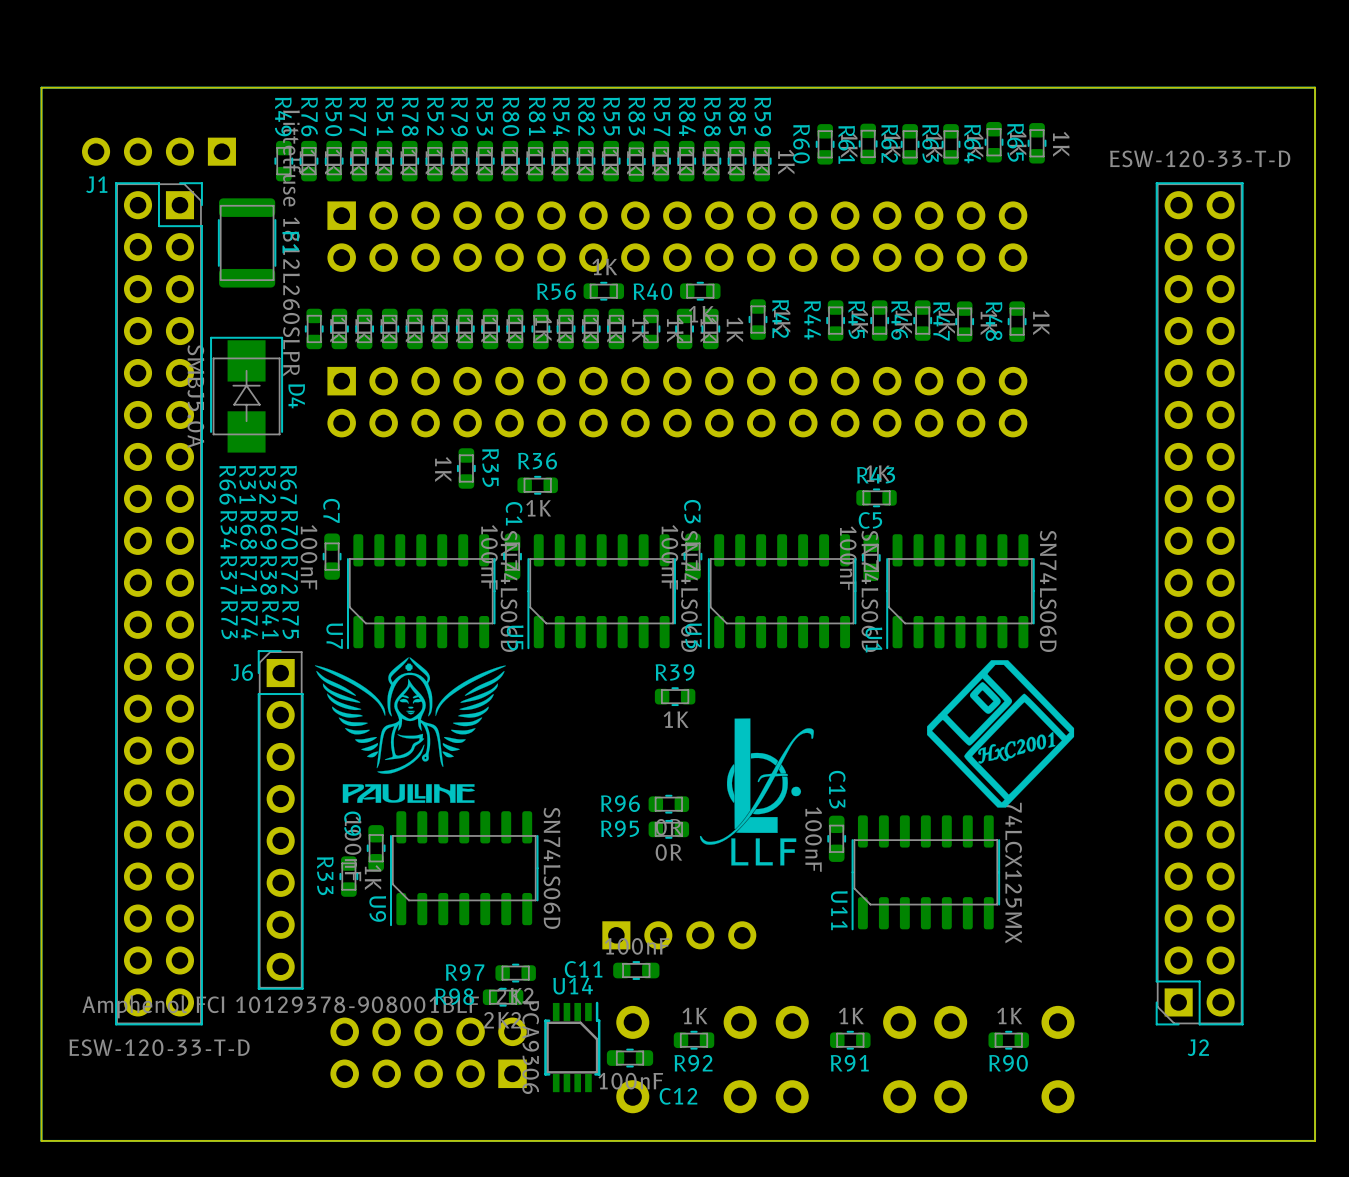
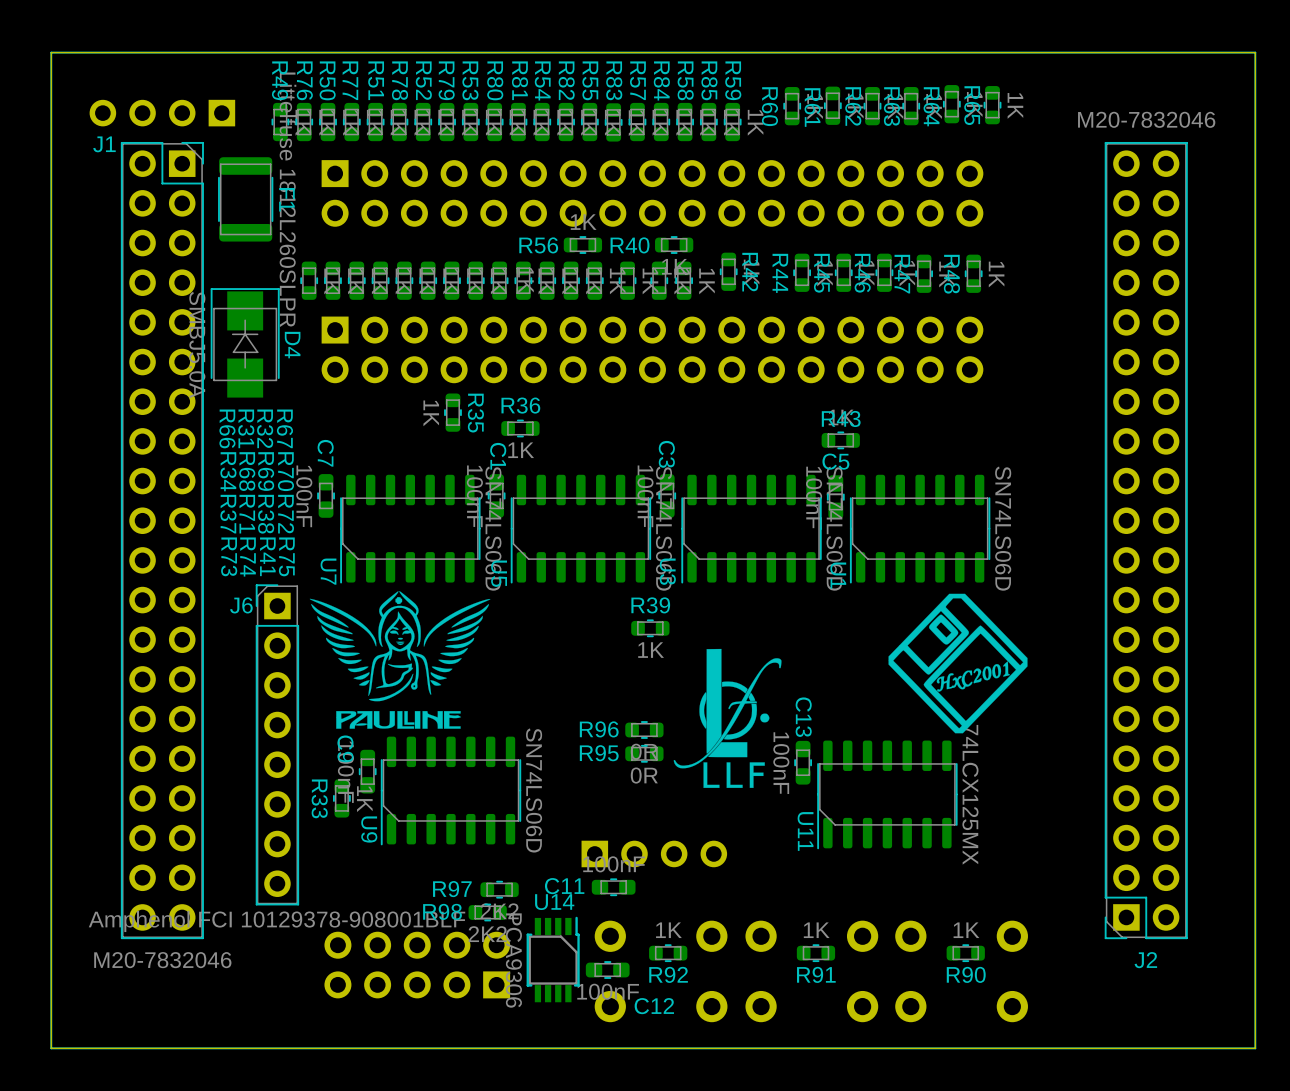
J2 value: ESW-120-33-T-D (1200, 158) -> M20-7832046 (1146, 119)
J1 value: ESW-120-33-T-D (159, 1047) -> M20-7832046 (162, 960)

